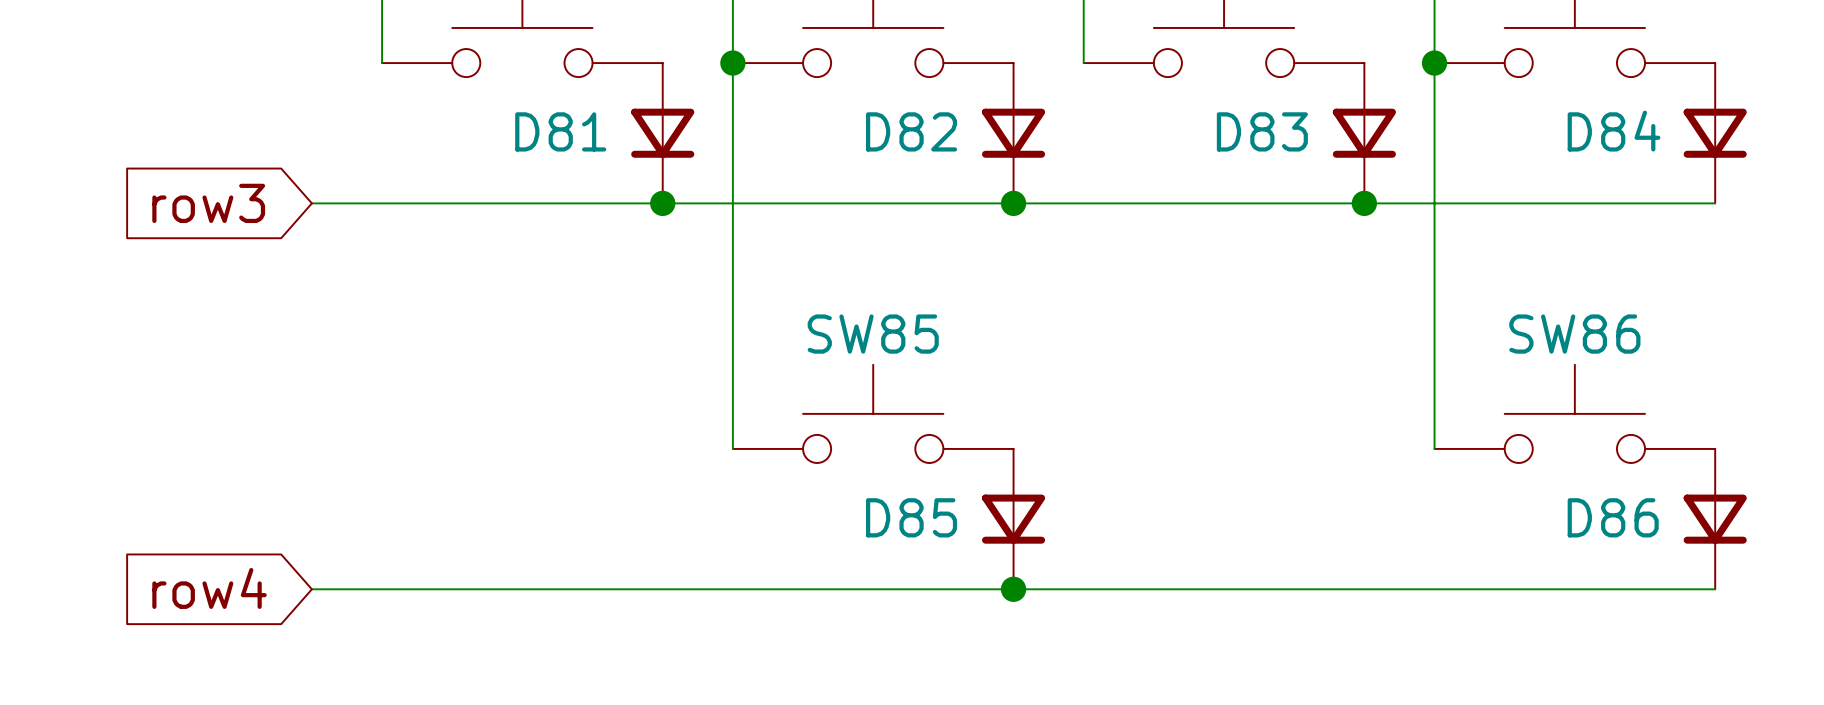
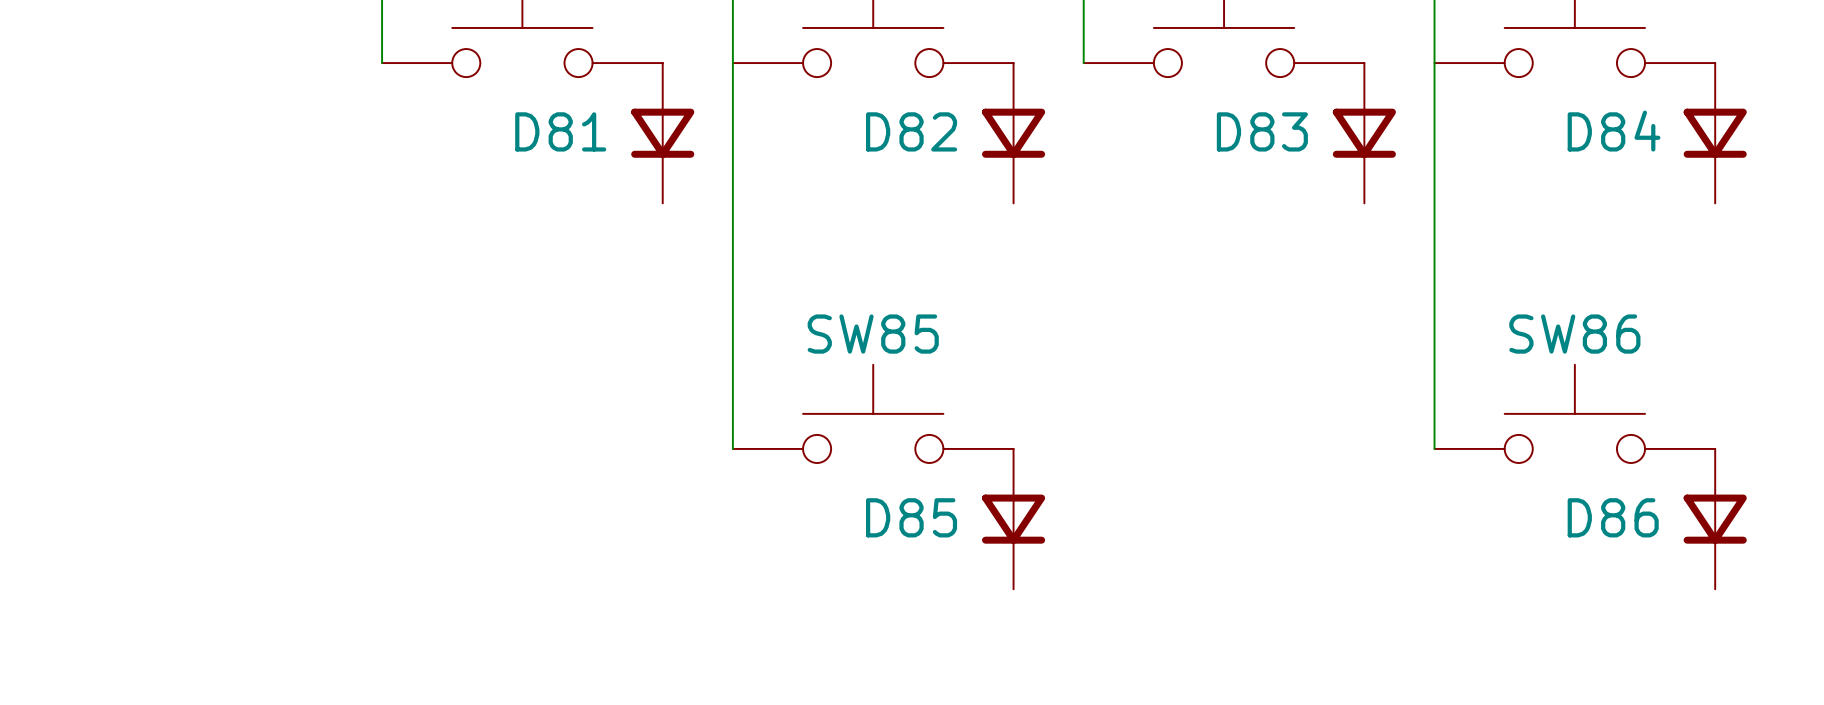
junction: (732, 63) -> none
junction: (1434, 63) -> none
global label: row3 (208, 203) -> none
wire: (311, 203) (1715, 203) -> none
junction: (662, 203) -> none
junction: (1013, 203) -> none
junction: (1364, 203) -> none
global label: row4 (209, 588) -> none
wire: (311, 589) (1715, 589) -> none
junction: (1013, 589) -> none

